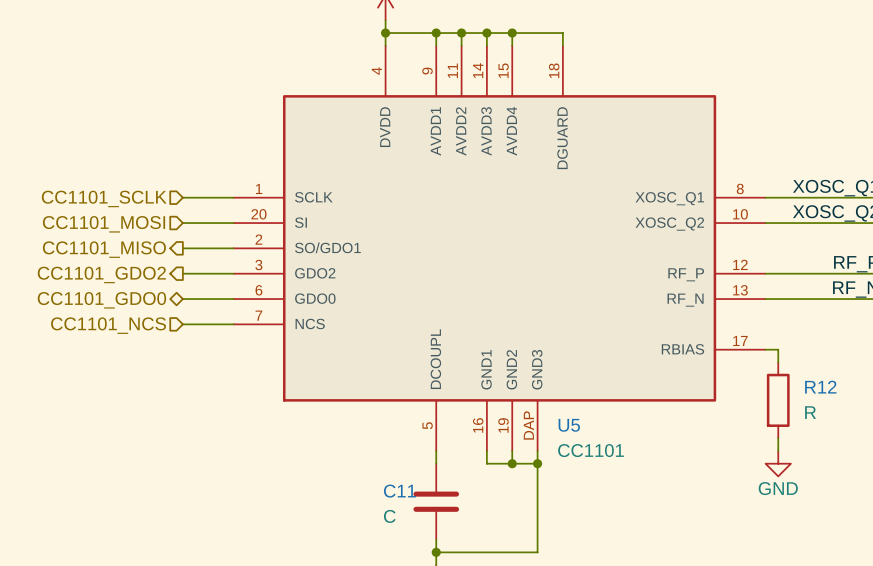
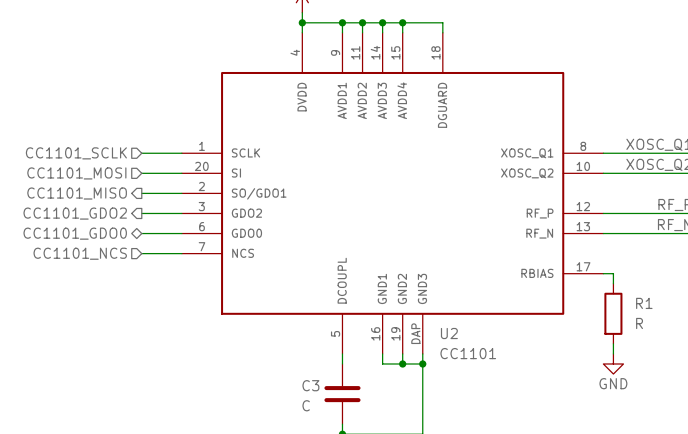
R12 name: R12 (820, 387) -> R1 (644, 303)
U5 name: U5 (569, 425) -> U2 (449, 333)
C11 name: C11 (399, 491) -> C3 (310, 385)

